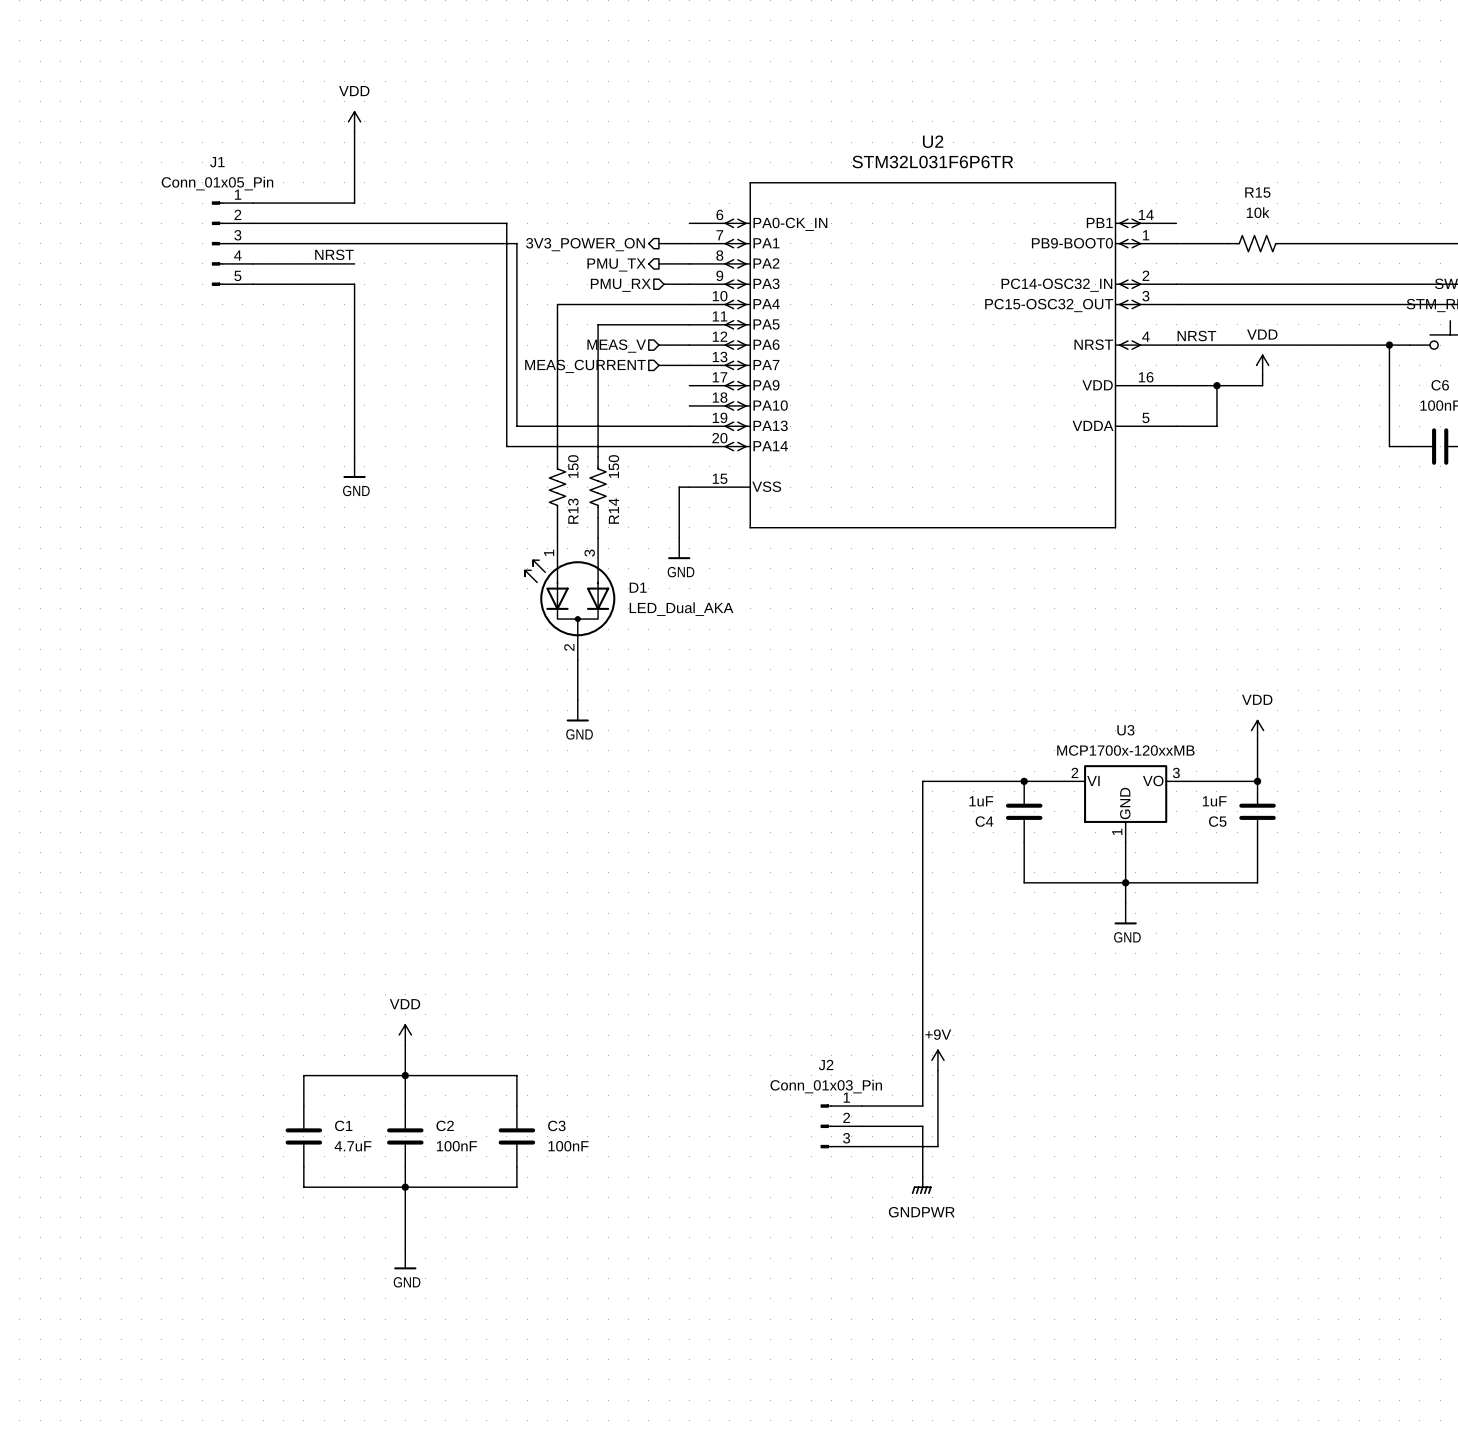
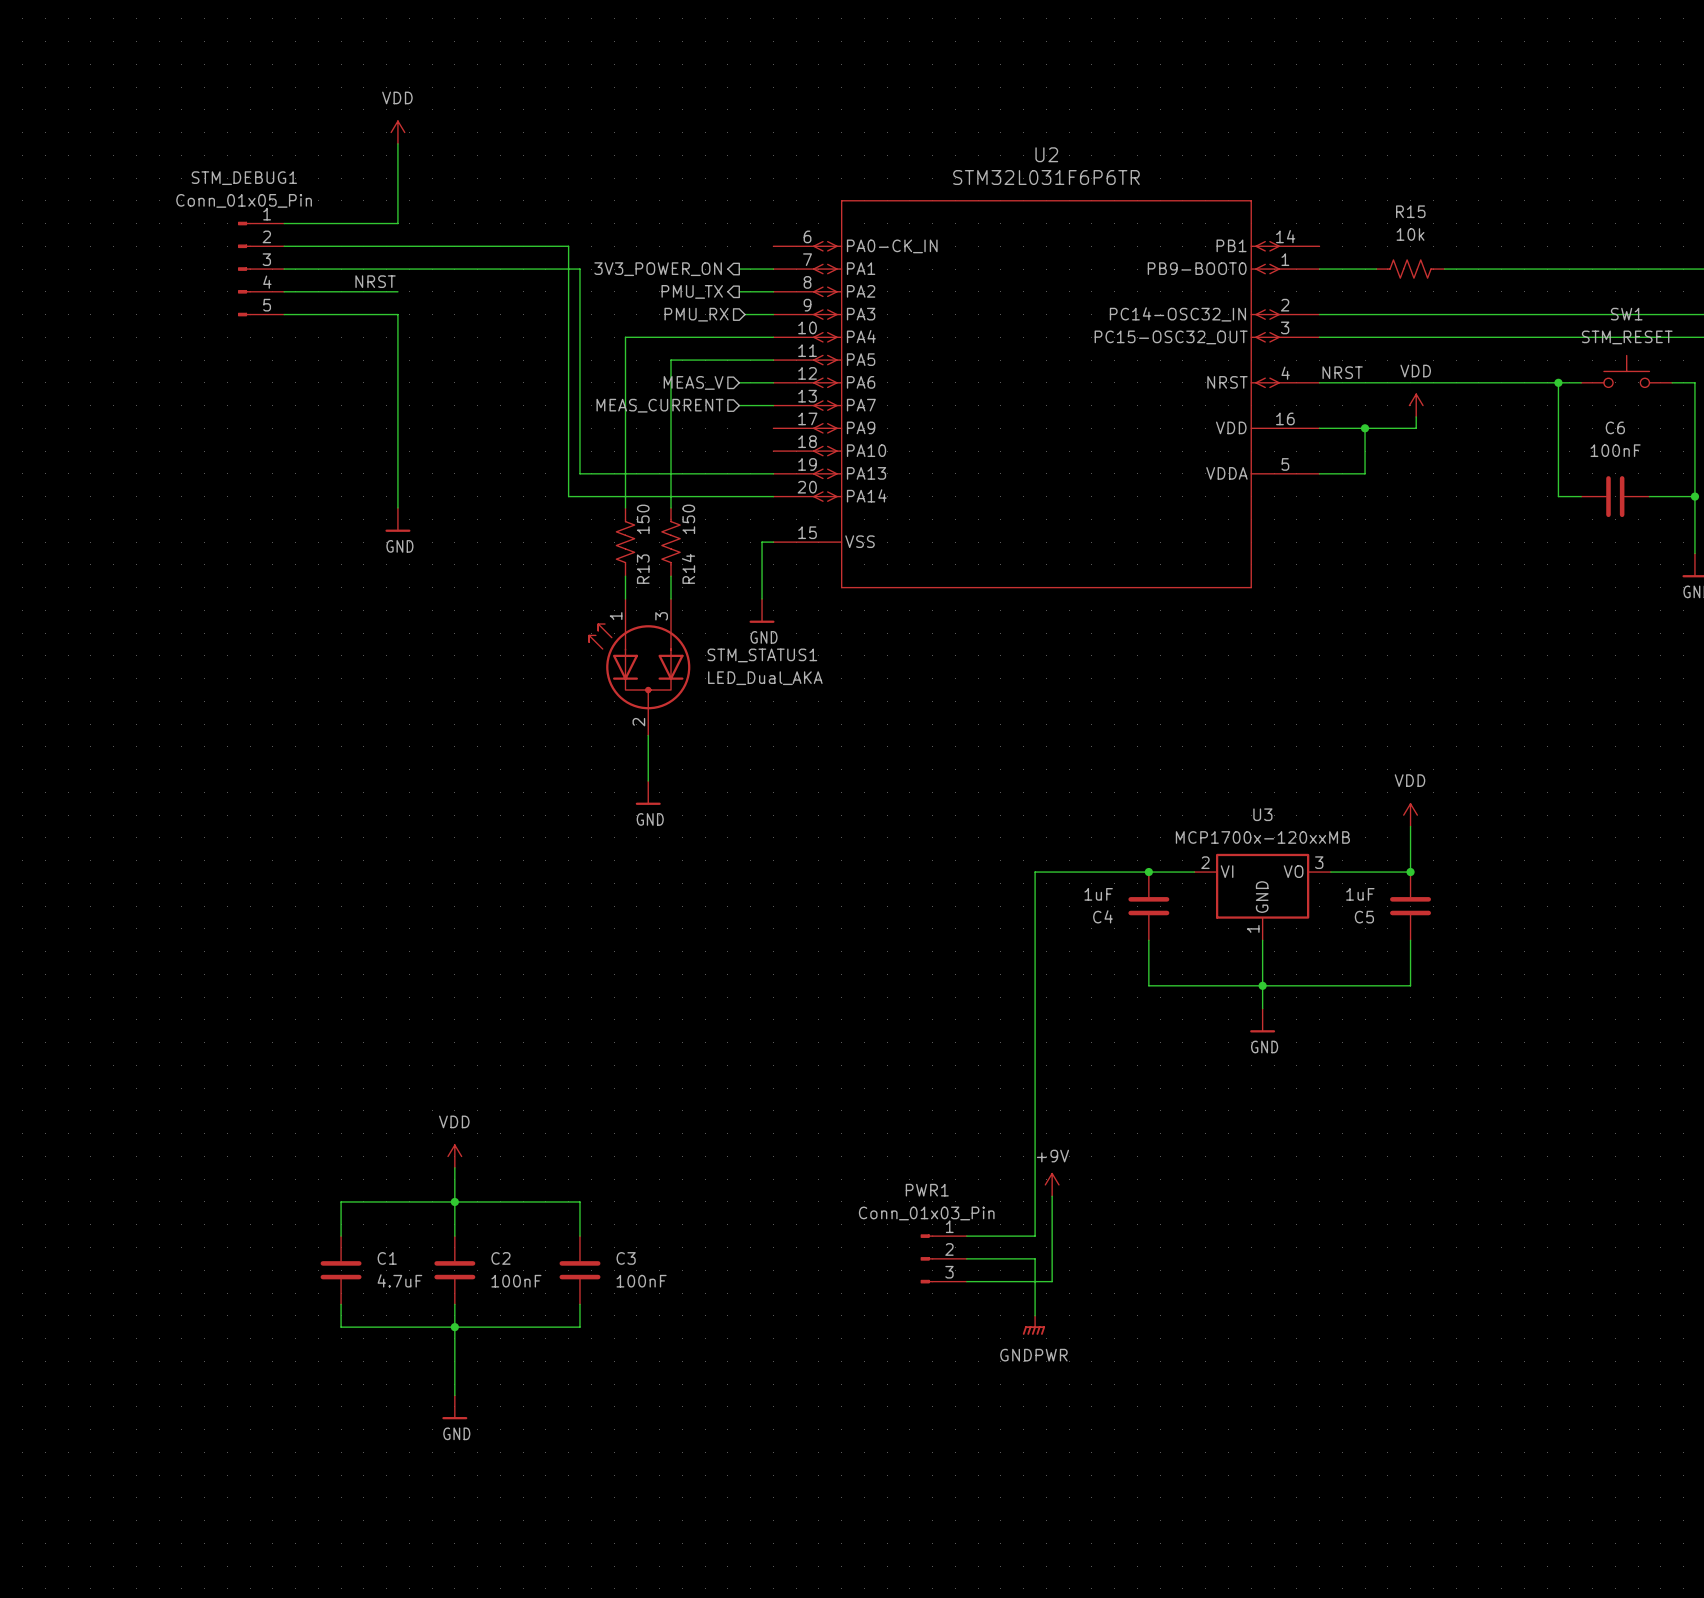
J1 name: J1 (217, 162) -> STM_DEBUG1 (244, 178)
D1 name: D1 (638, 587) -> STM_STATUS1 (762, 655)
J2 name: J2 (826, 1065) -> PWR1 (927, 1190)

